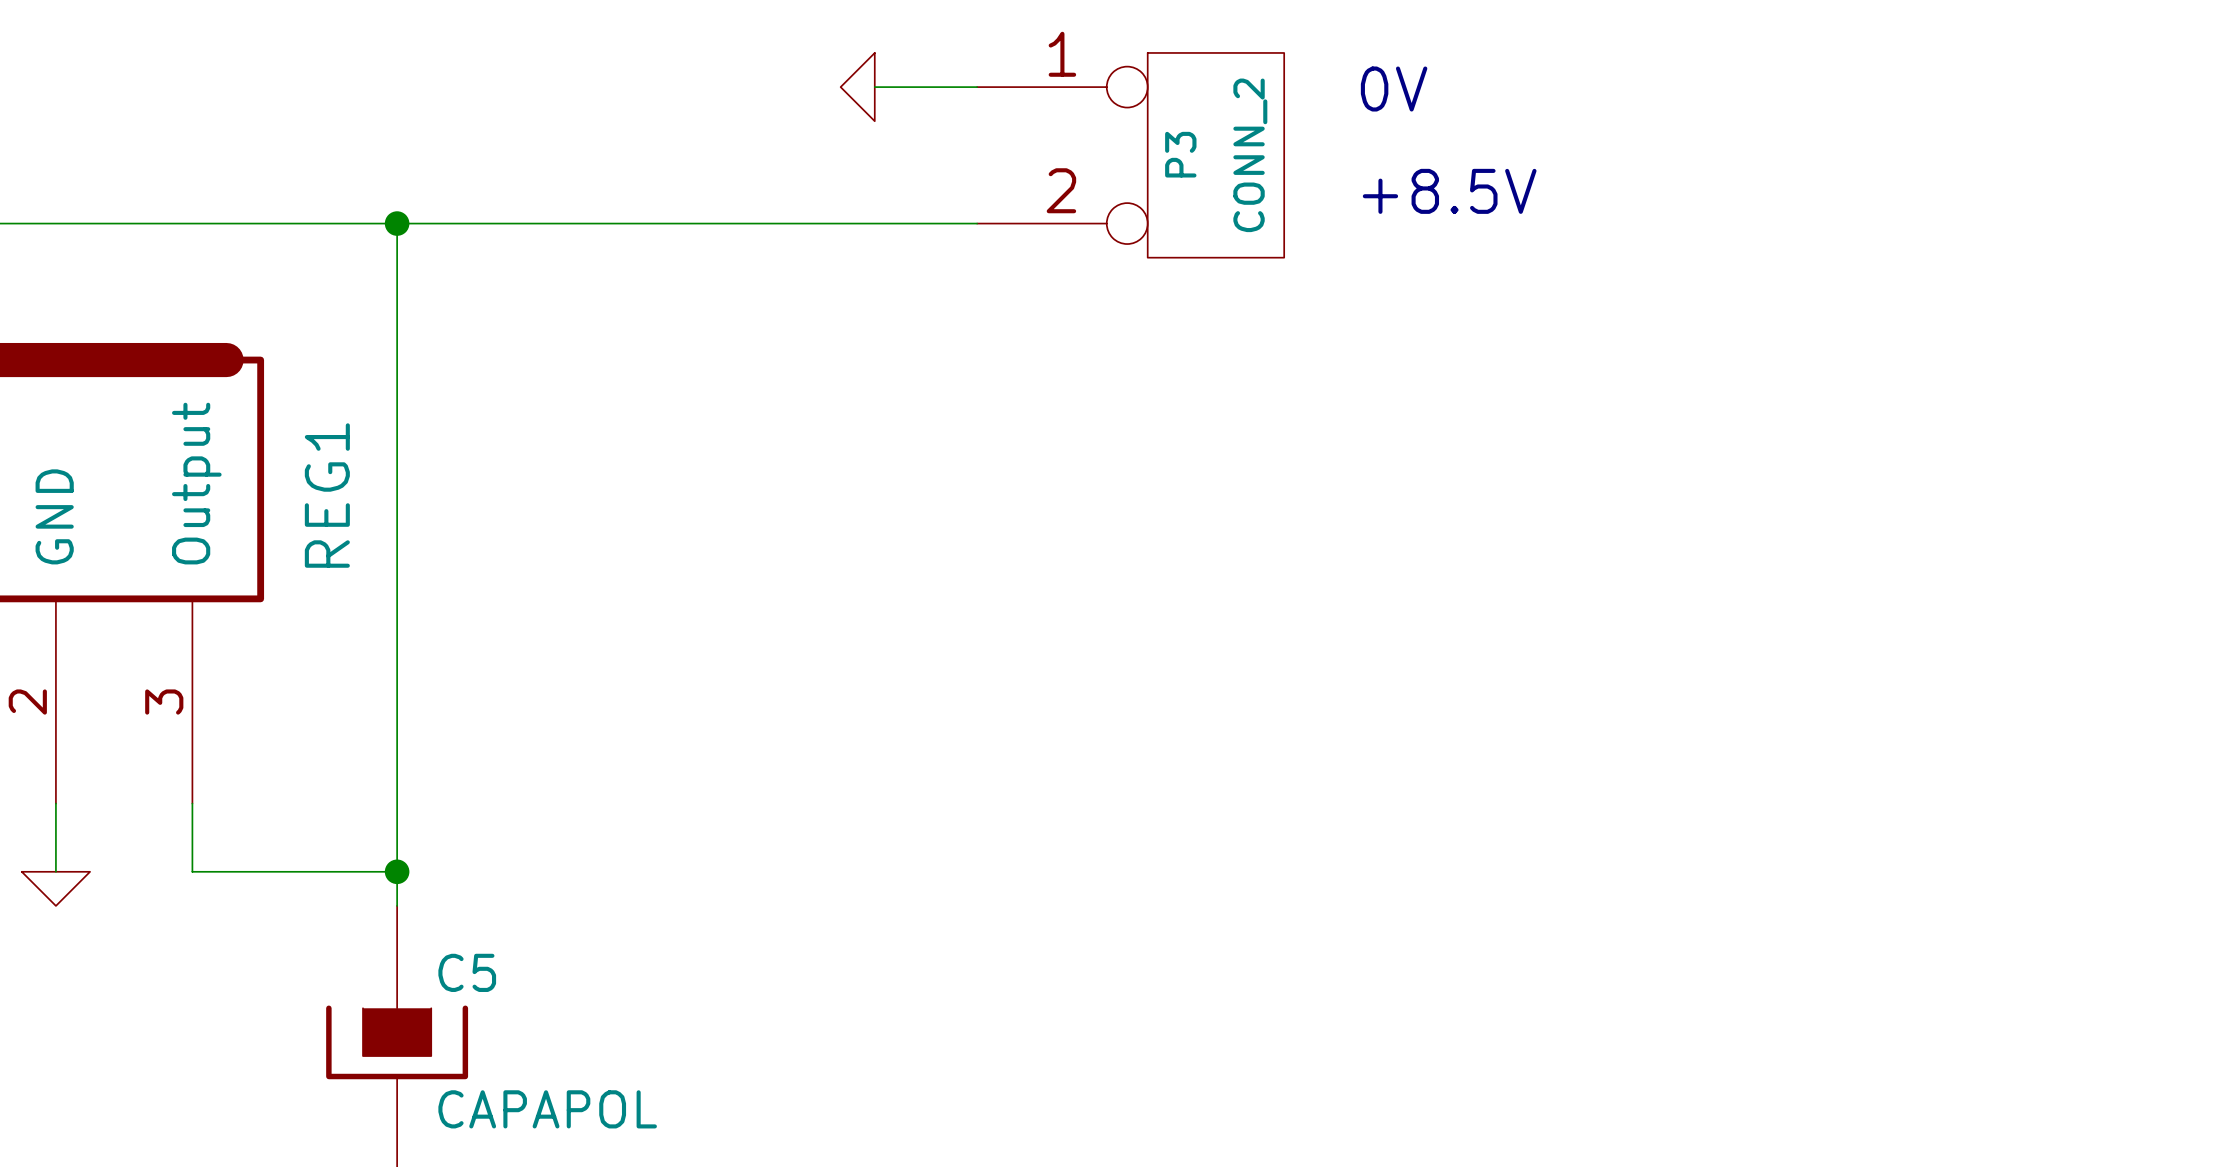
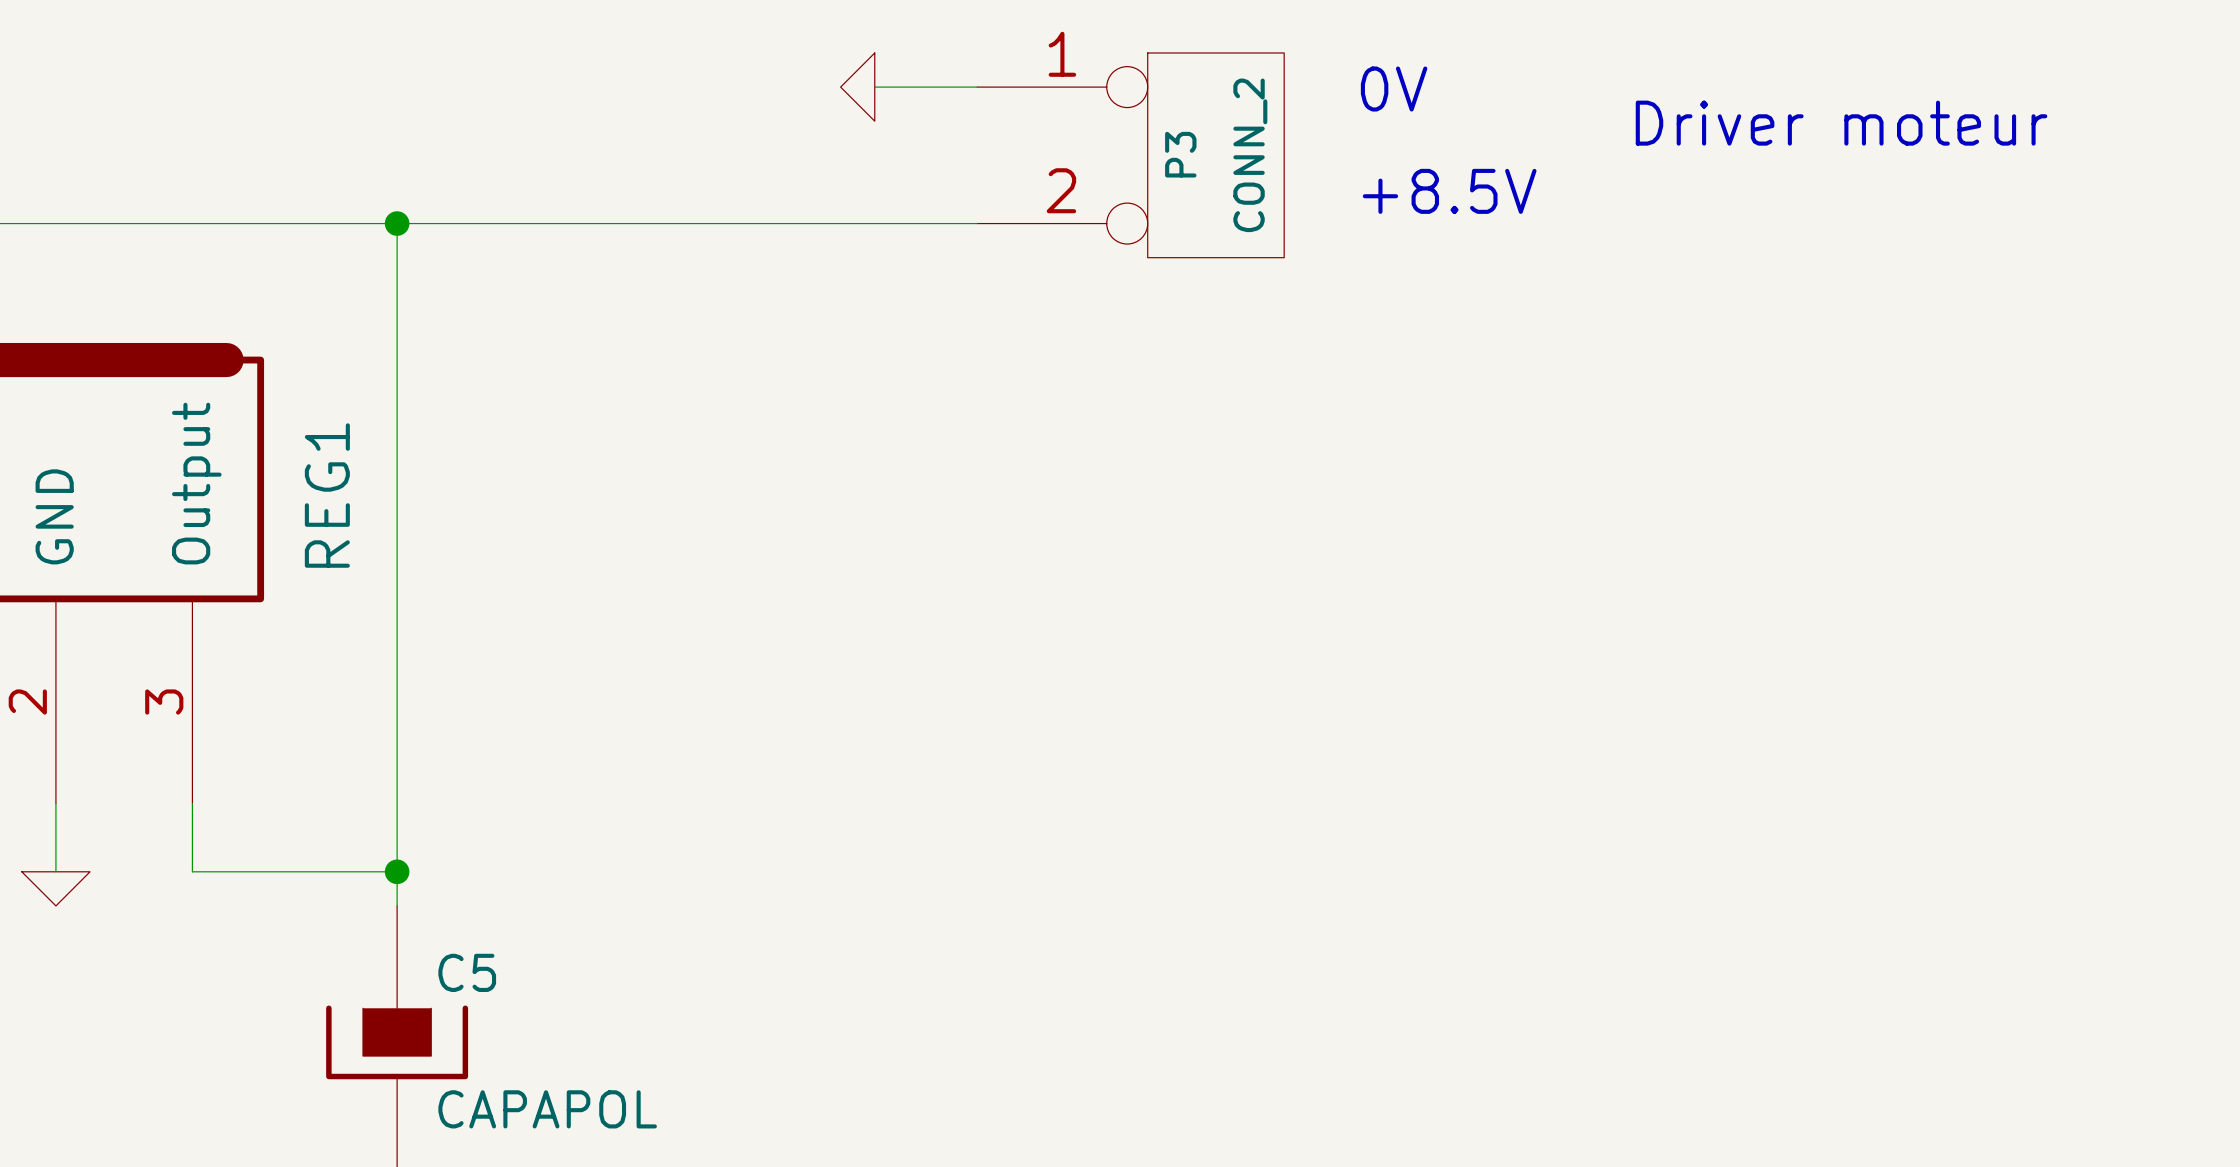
text: none -> Driver moteur (1841, 123)

